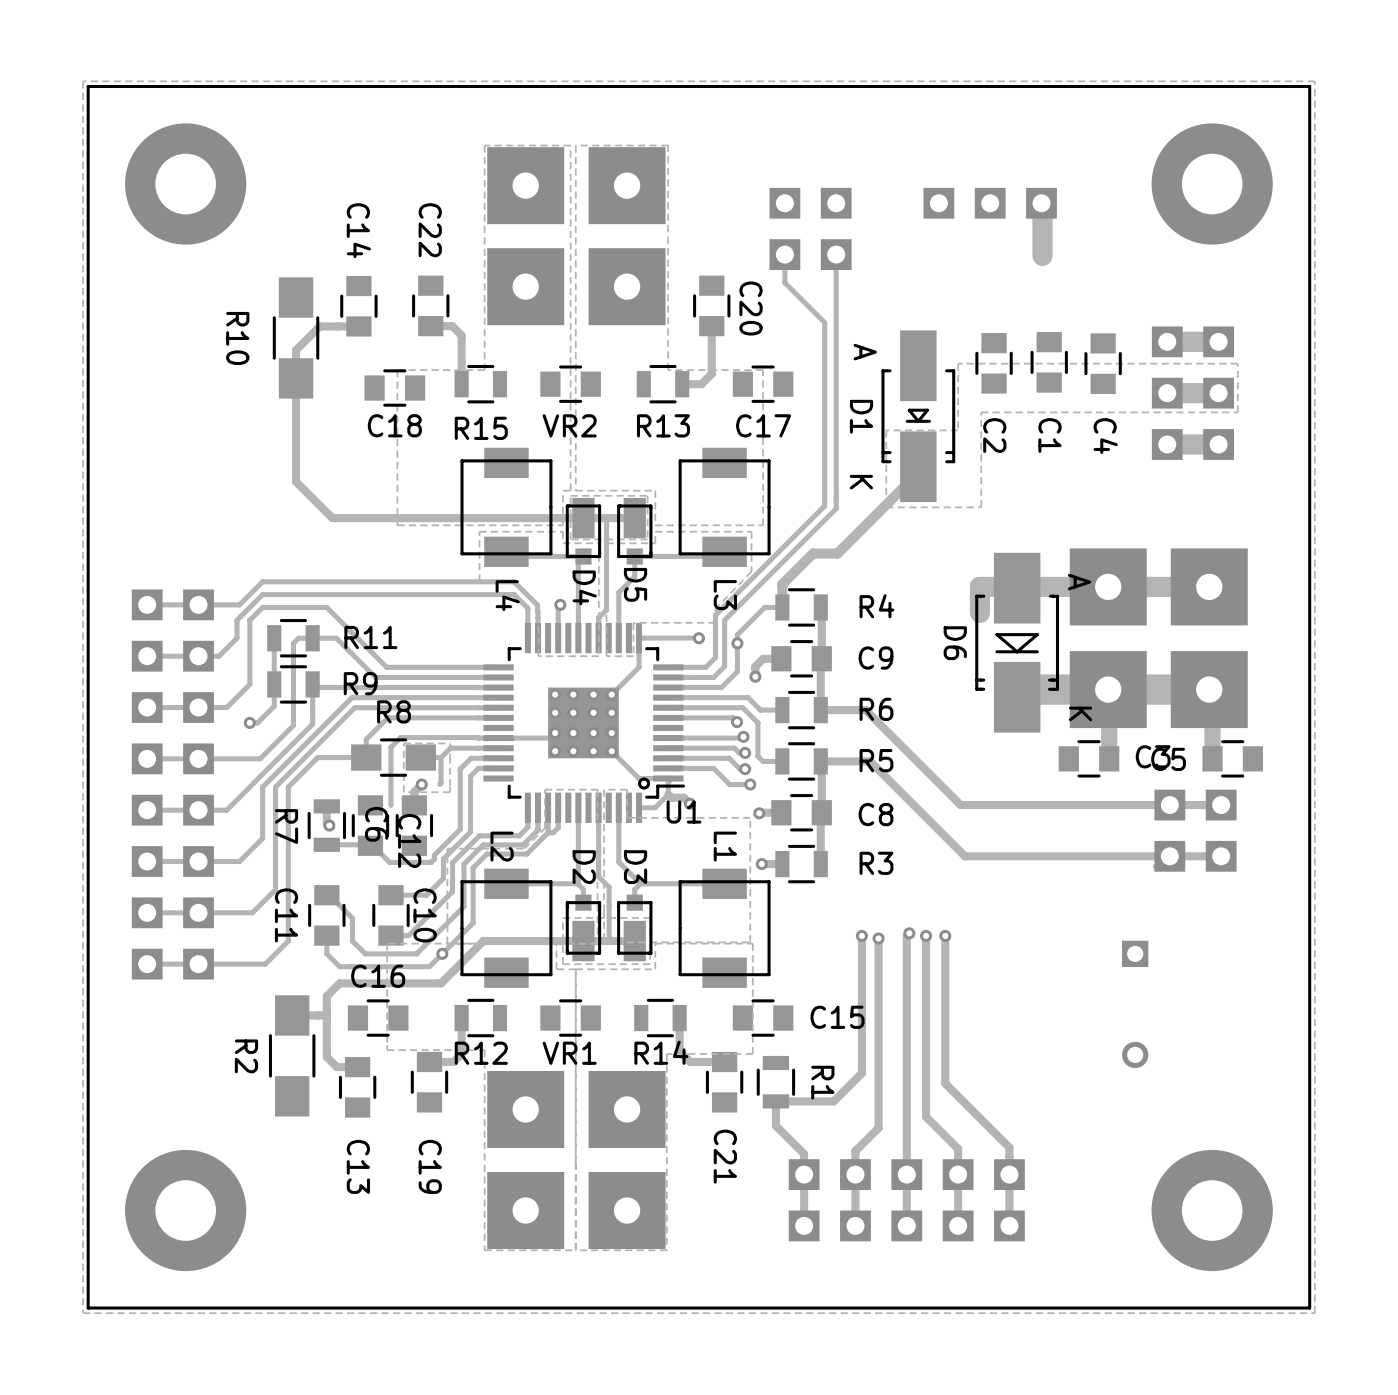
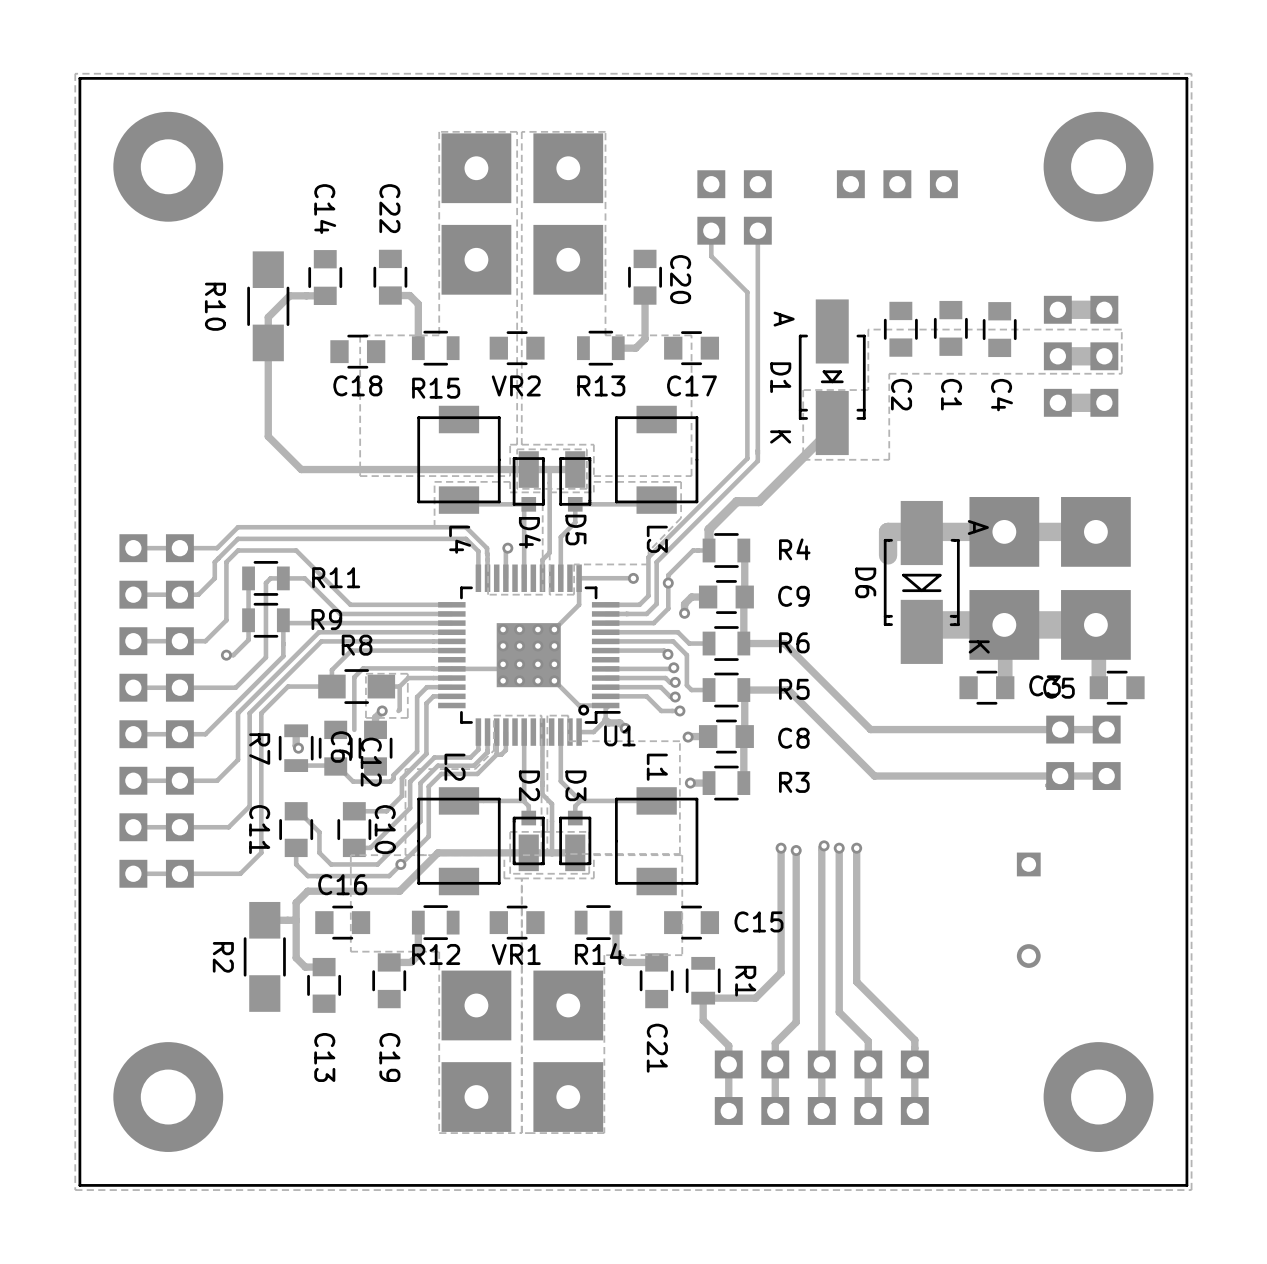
track: (1042, 204) (1042, 255) -> none

